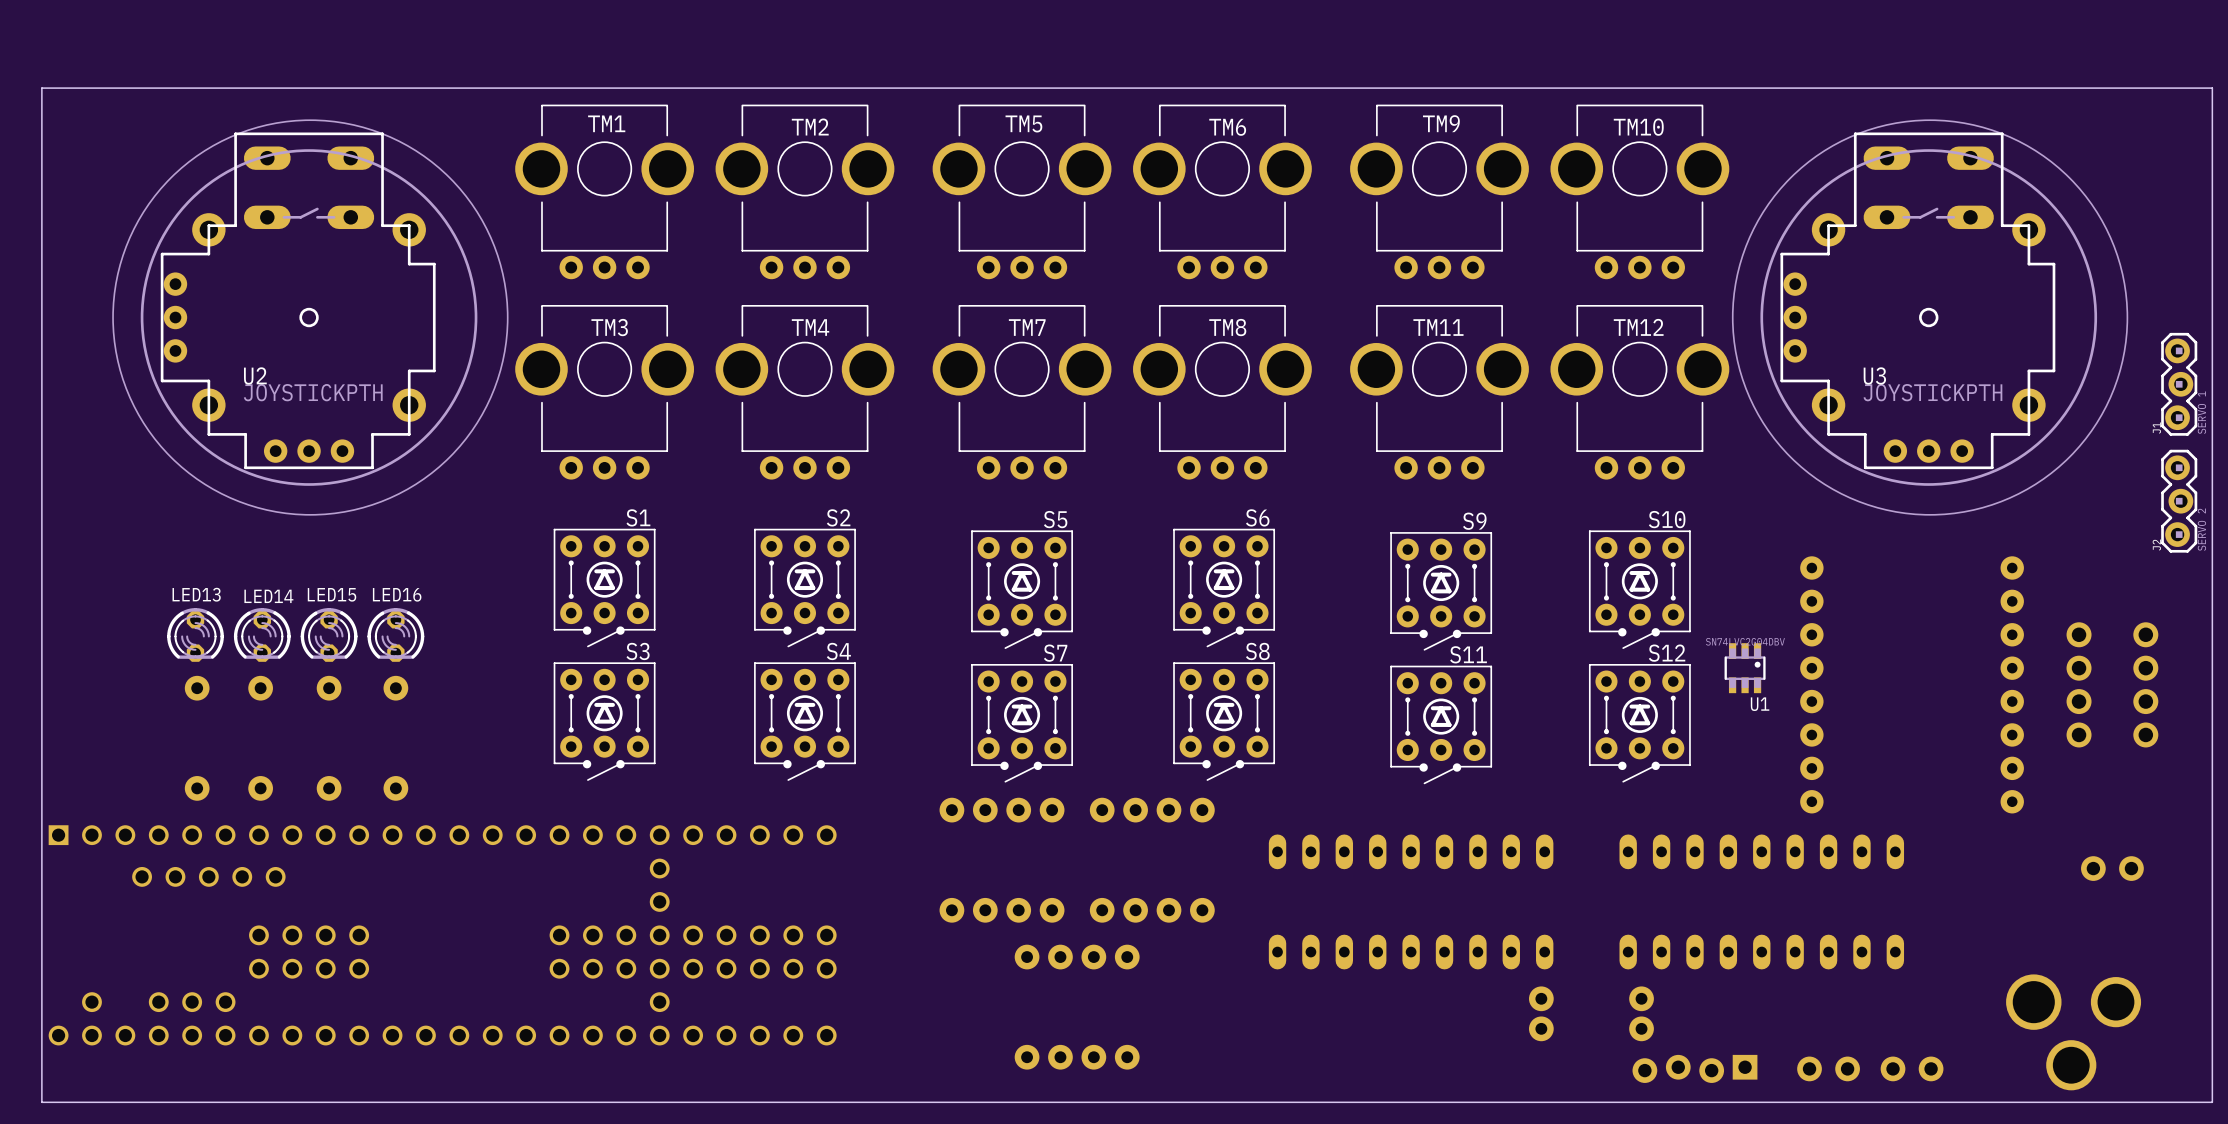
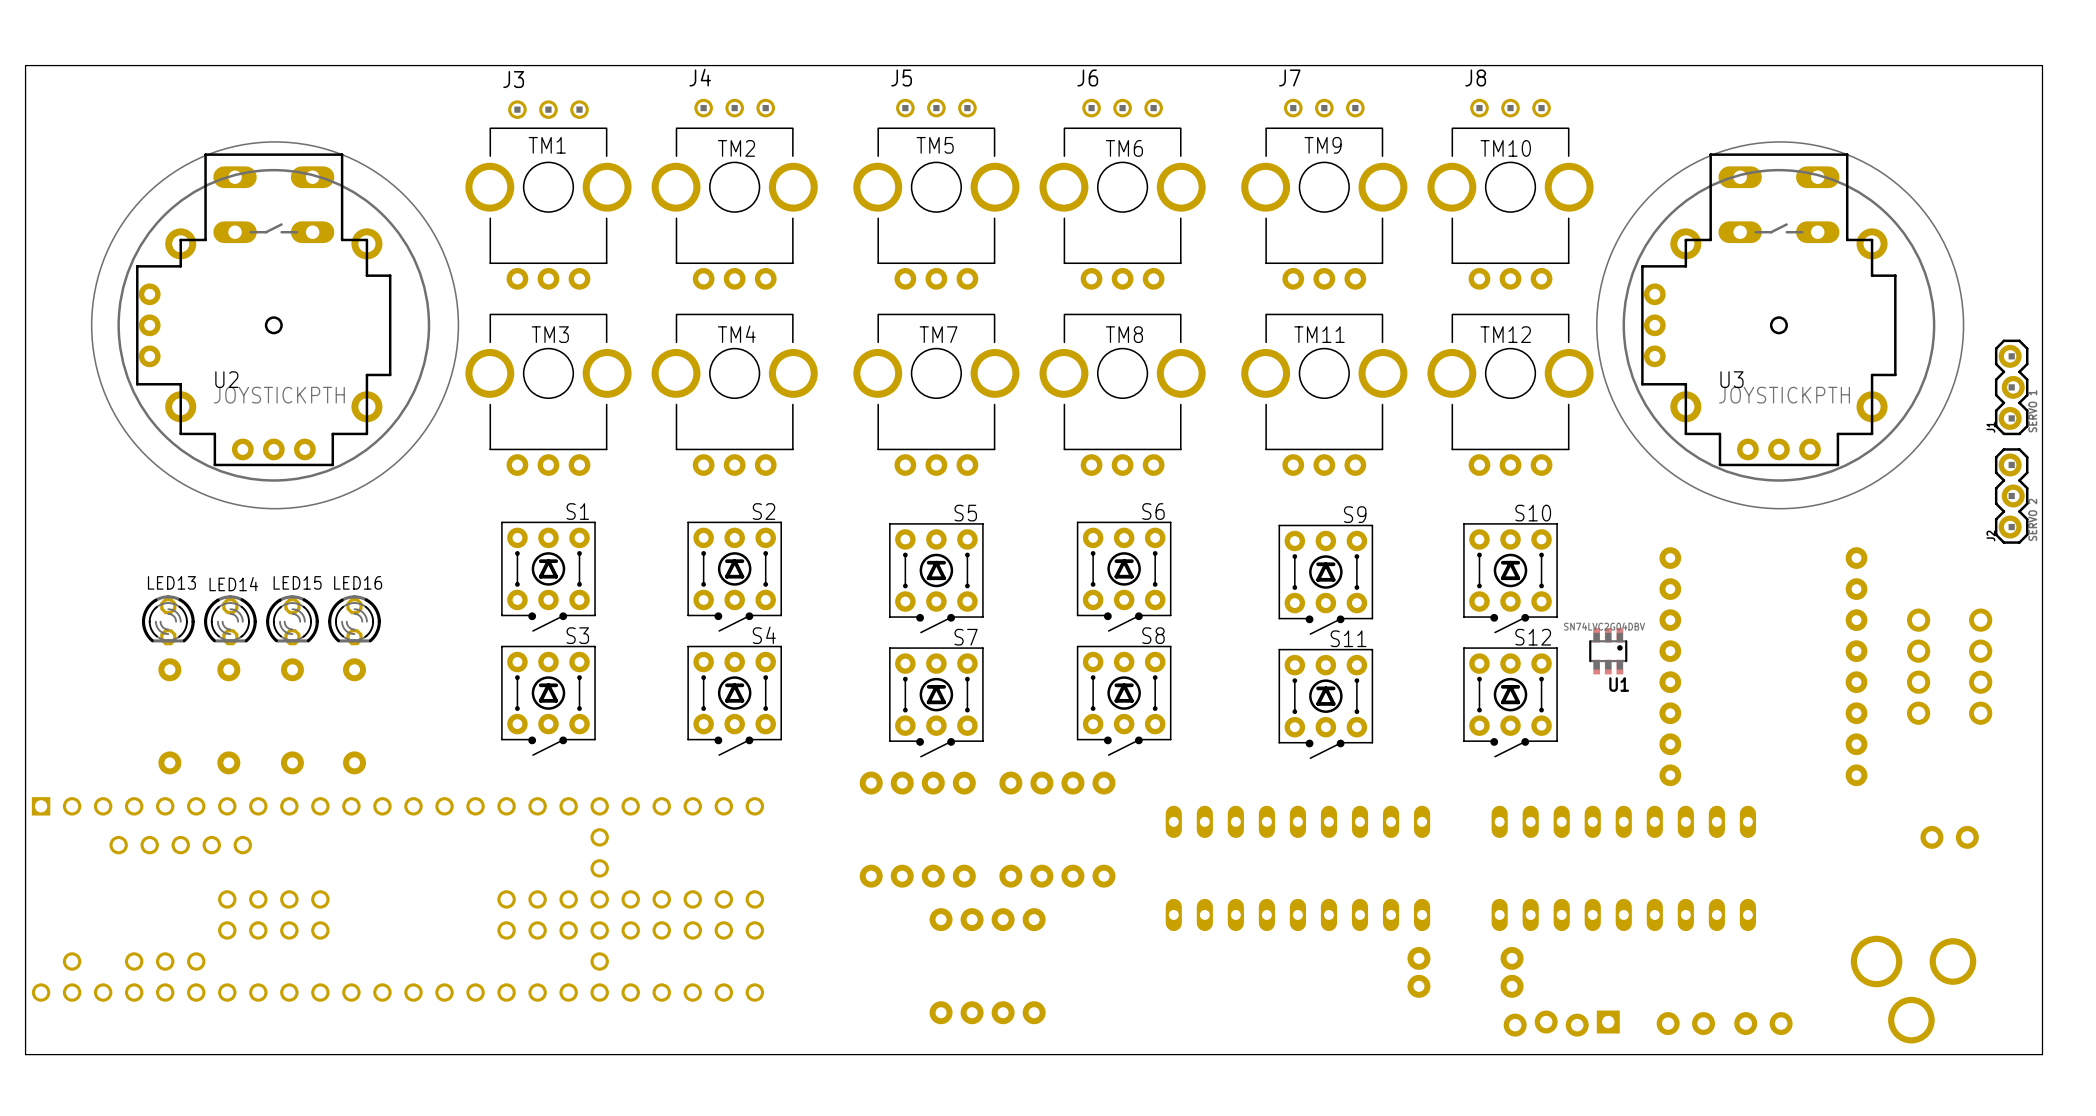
J4: none -> (734, 108)
J5: none -> (936, 108)
J6: none -> (1122, 108)
J7: none -> (1324, 108)
J8: none -> (1510, 108)
J3: none -> (548, 109)
board edge: (41, 88) (2212, 88) -> (25, 112) (25, 65) (2042, 65) (2042, 112)

